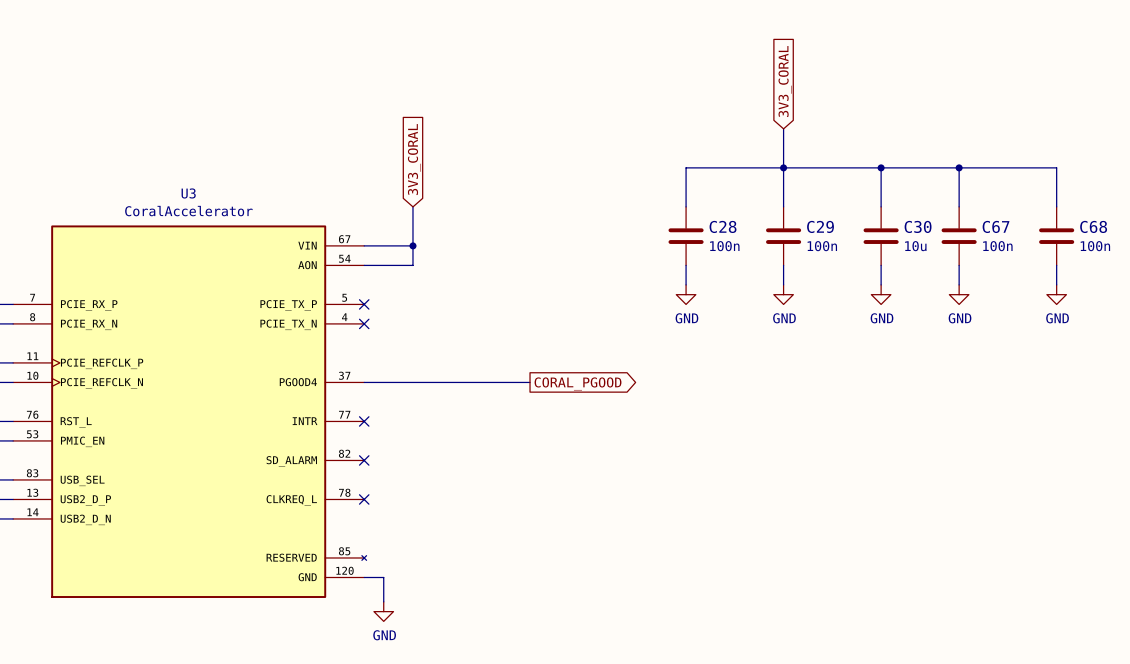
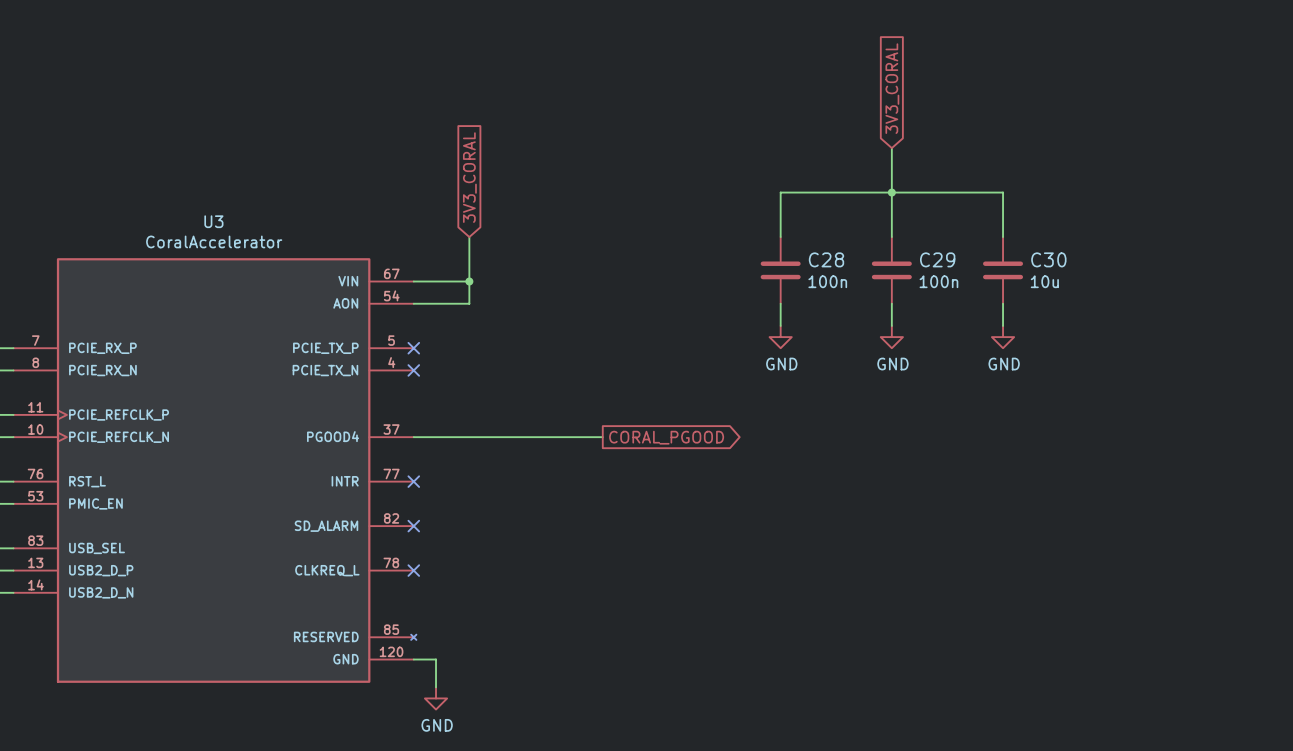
wire: (881, 167) (1056, 167) (1056, 206) -> none
junction: (881, 167) -> none
wire: (959, 167) (959, 206) -> none
junction: (959, 167) -> none
C67: (959, 236) -> none
C68: (1056, 236) -> none
wire: (959, 265) (959, 284) -> none
wire: (1056, 265) (1056, 284) -> none
power symbol: GND (959, 294) -> none
power symbol: GND (1056, 294) -> none

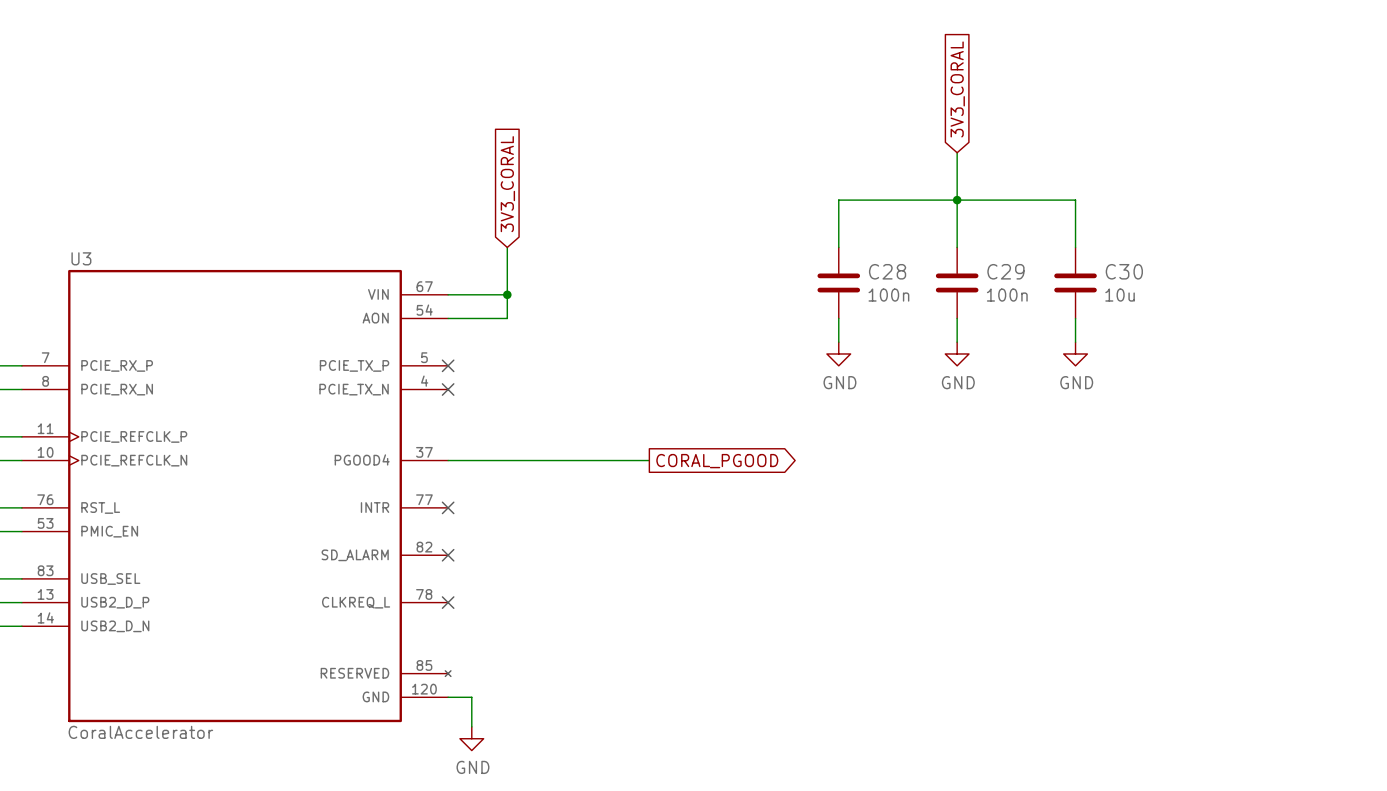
U3 name position: U3 (213, 221) -> U3 (81, 258)
U3 value position: CoralAccelerator (214, 241) -> CoralAccelerator (140, 732)

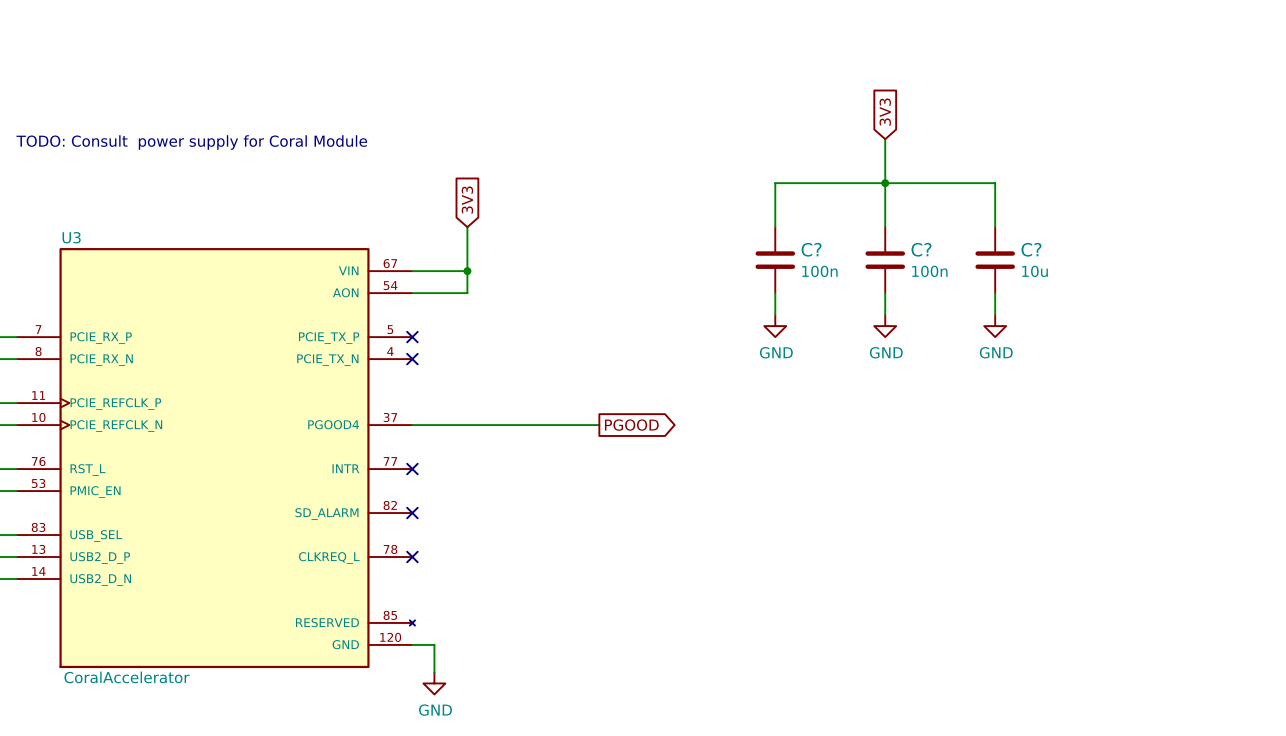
global label: 3V3_CORAL (957, 89) -> 3V3 (885, 112)
text: none -> TODO: Consult power supply for Coral Module (191, 142)
global label: 3V3_CORAL (507, 184) -> 3V3 (467, 200)
C28 name: C28 (887, 271) -> C? (811, 249)
C29 name: C29 (1005, 271) -> C? (921, 249)
C30 name: C30 (1124, 271) -> C? (1031, 249)
global label: CORAL_PGOOD (717, 461) -> PGOOD (631, 425)

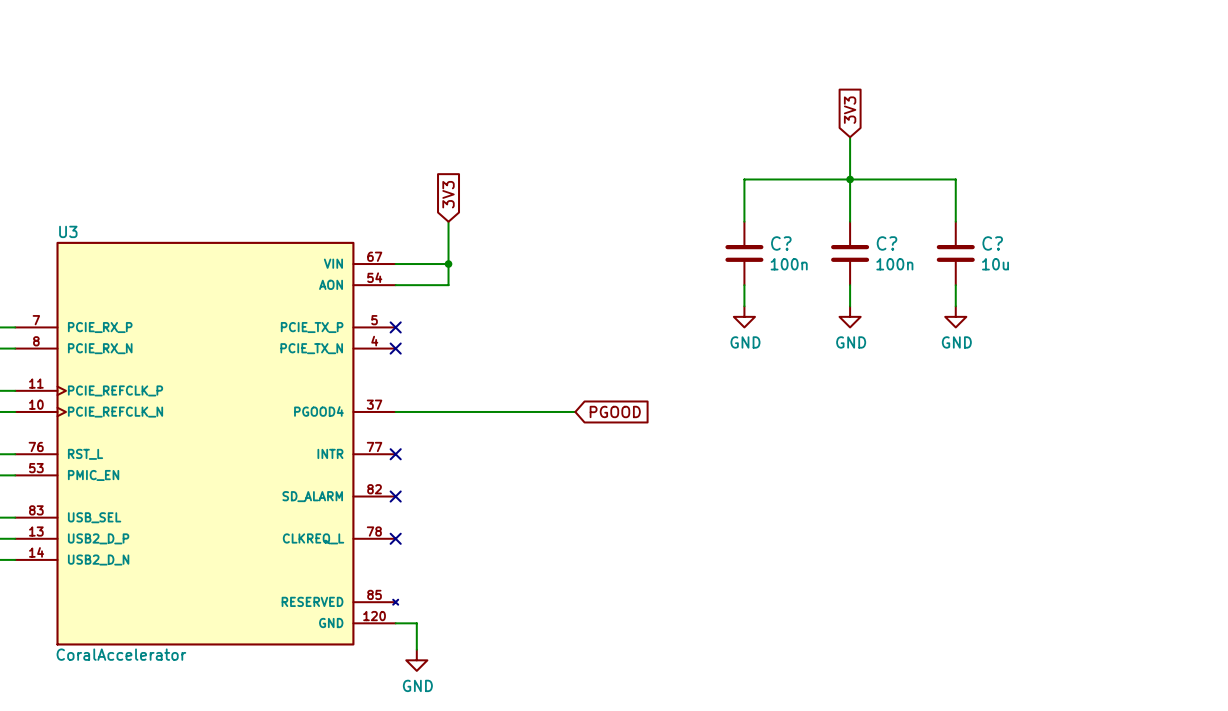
text: TODO: Consult power supply for Coral Module (191, 142) -> none
global label shape: output (631, 425) -> input (615, 411)

